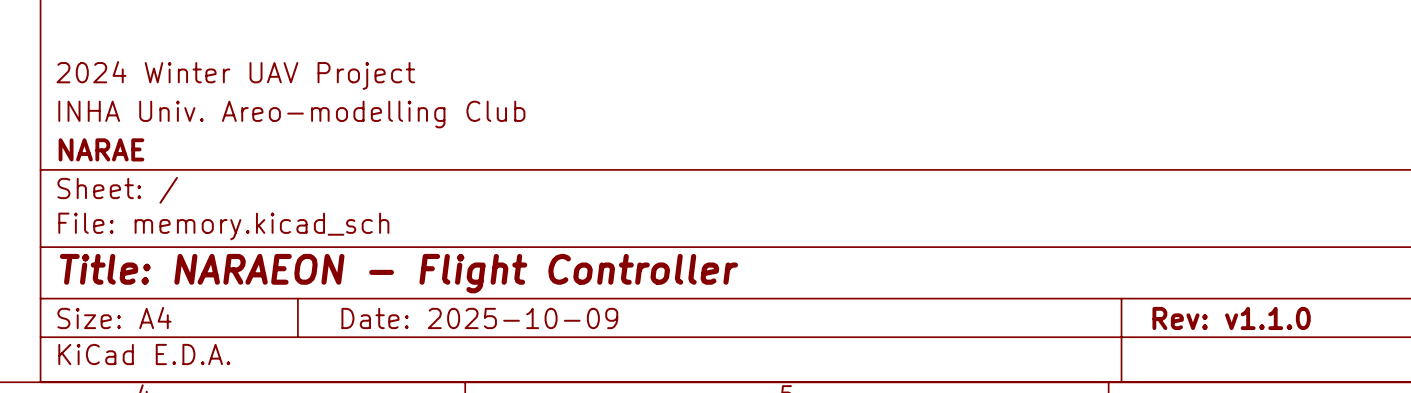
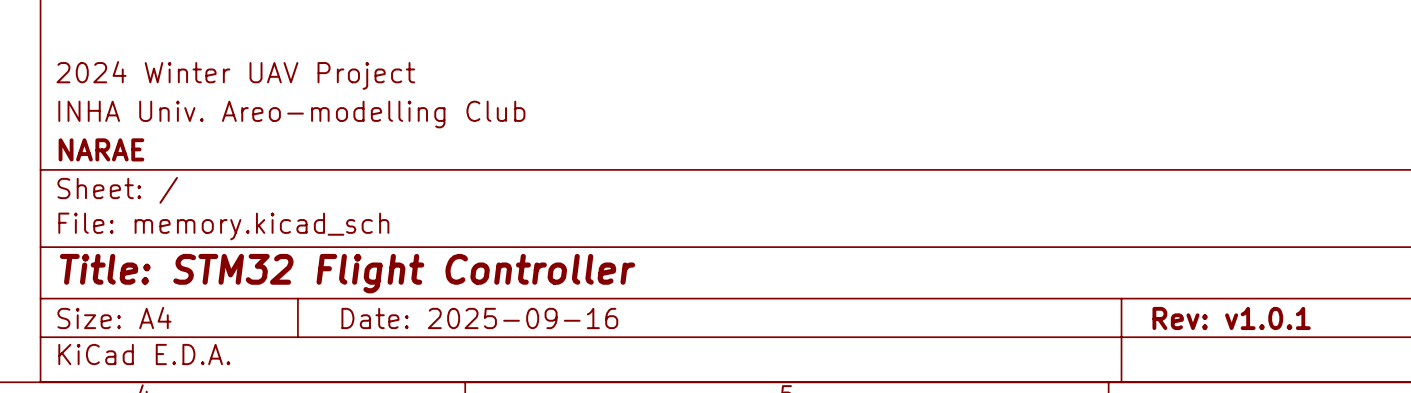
title block: Title: NARAEON - Flight Controller (398, 273) -> Title: STM32 Flight Controller (347, 273)
title block: Date: 2025-10-09 (479, 318) -> Date: 2025-09-16 (479, 318)
title block: Rev: v1.1.0 (1231, 318) -> Rev: v1.0.1 (1231, 318)

